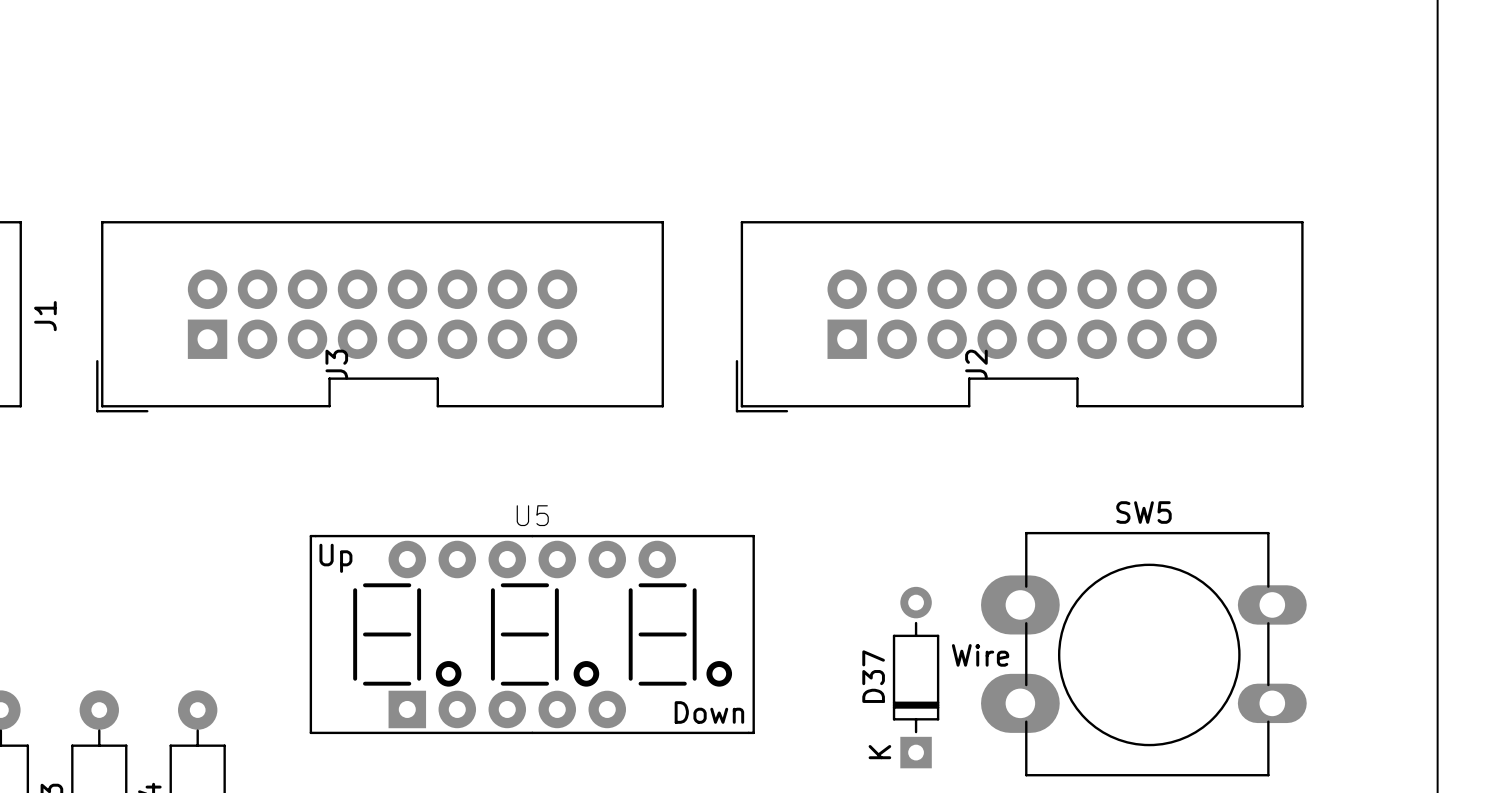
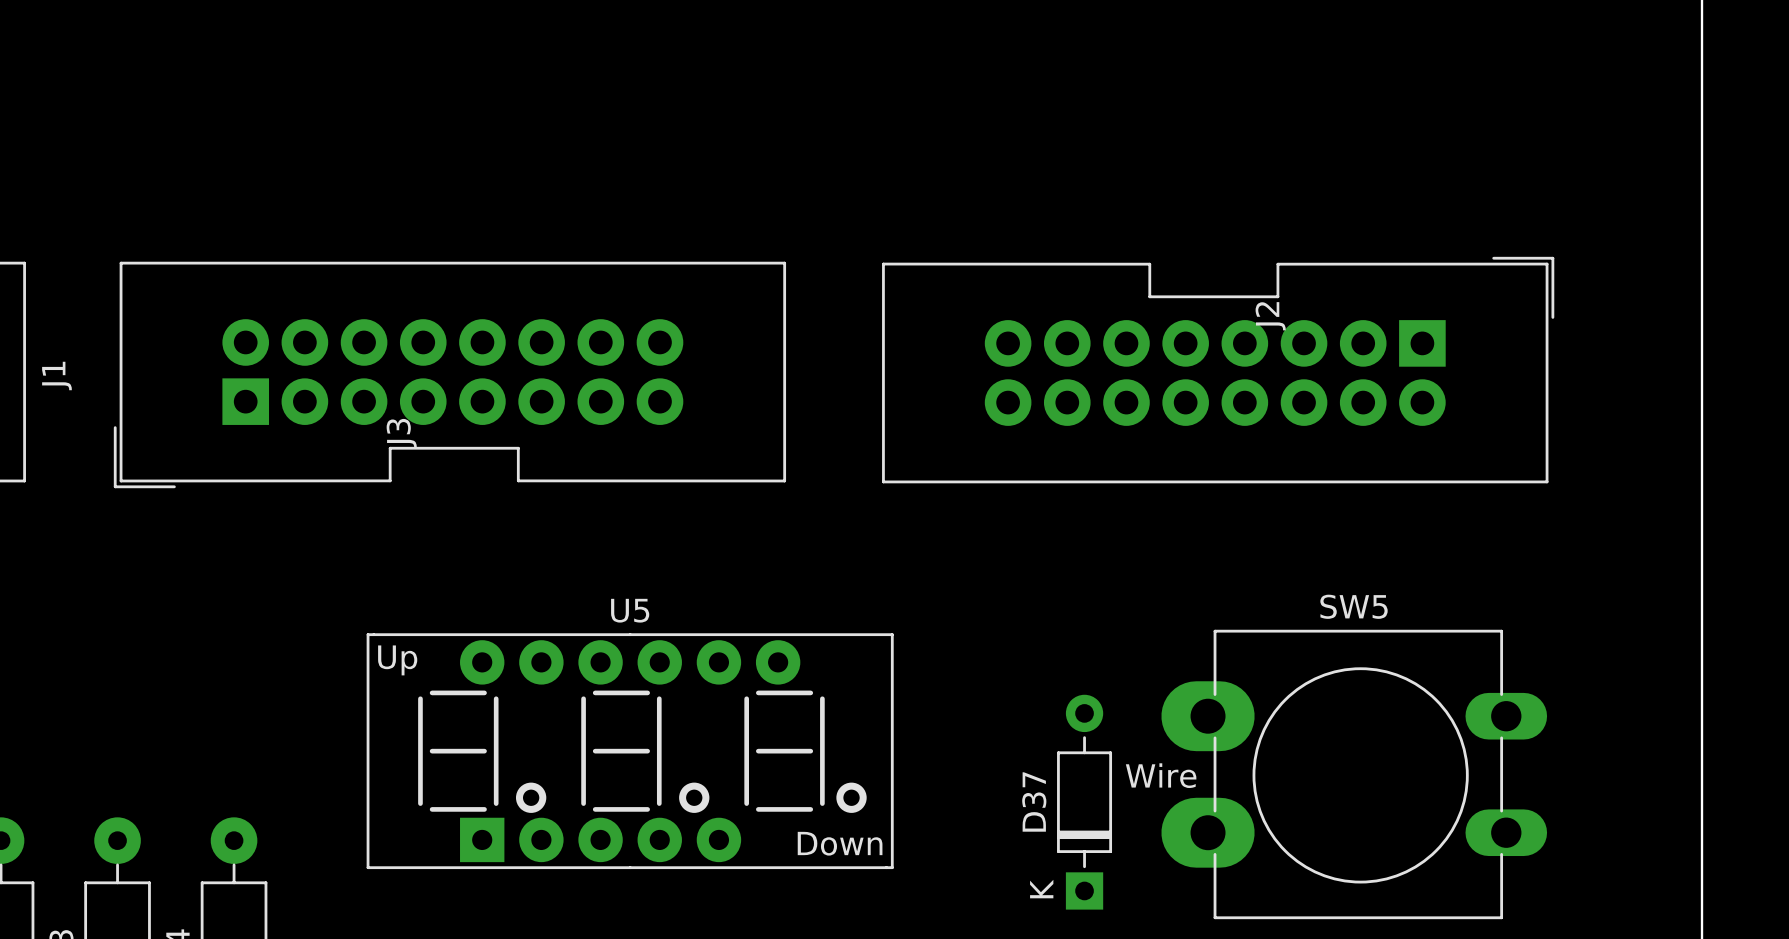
J2 rotation: 0° (1019, 316) -> 180° (1218, 370)

